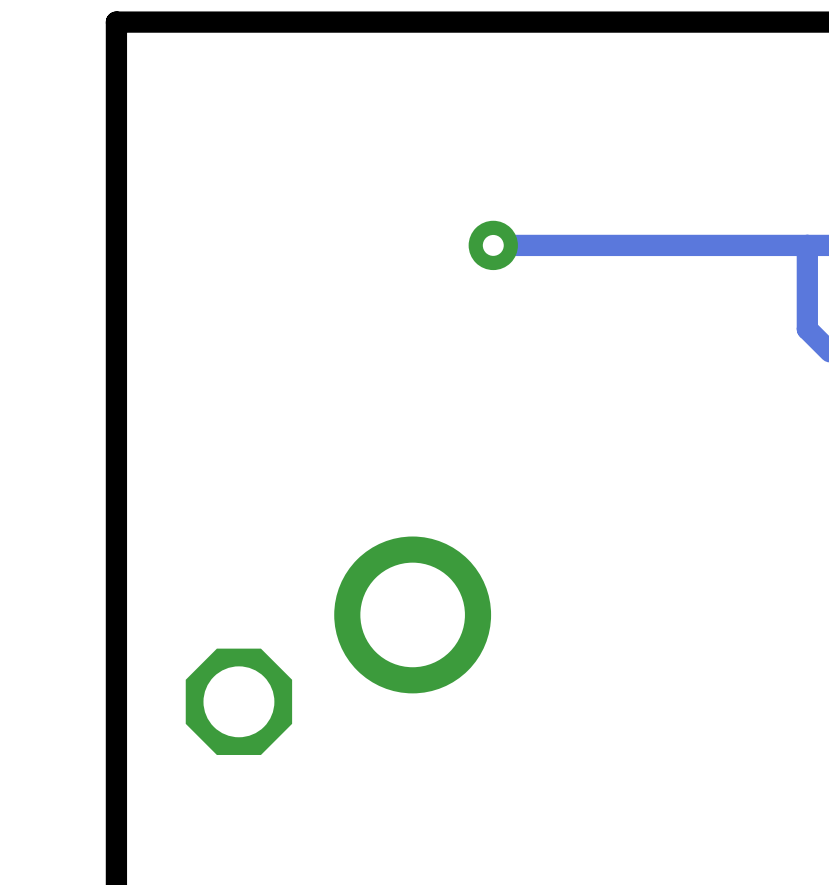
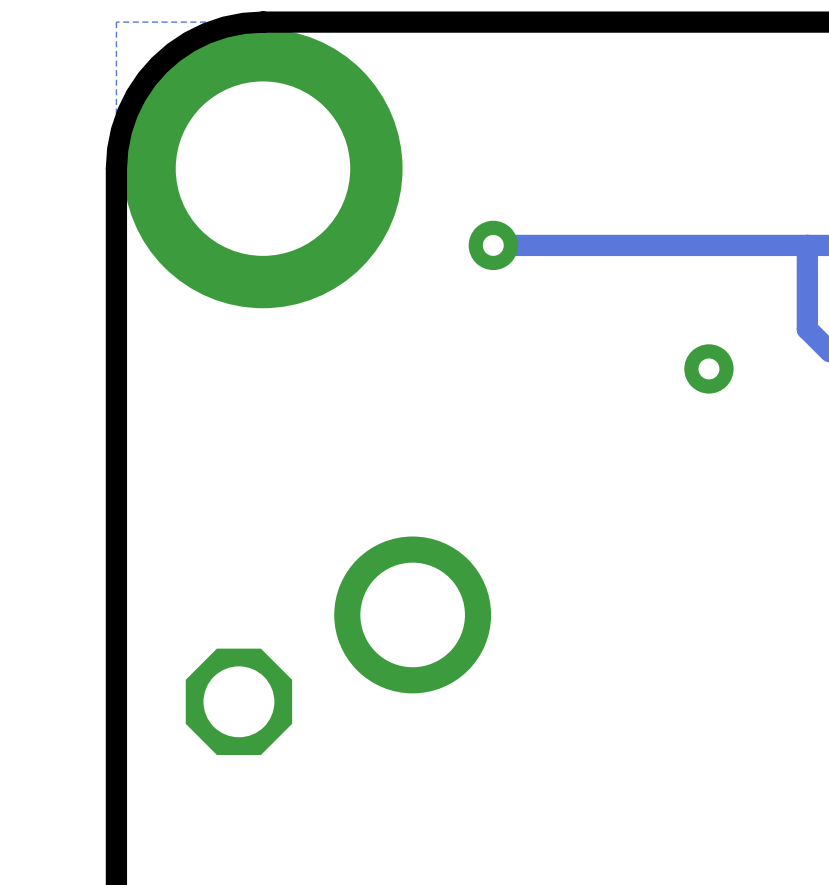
board edge: (262, 22) (116, 22) (116, 168) -> (262, 22) (225, 27) (206, 33) (189, 41) (159, 65) (136, 95) (127, 112) (121, 130) (116, 168)
via: none -> (262, 168)
via: none -> (708, 368)

